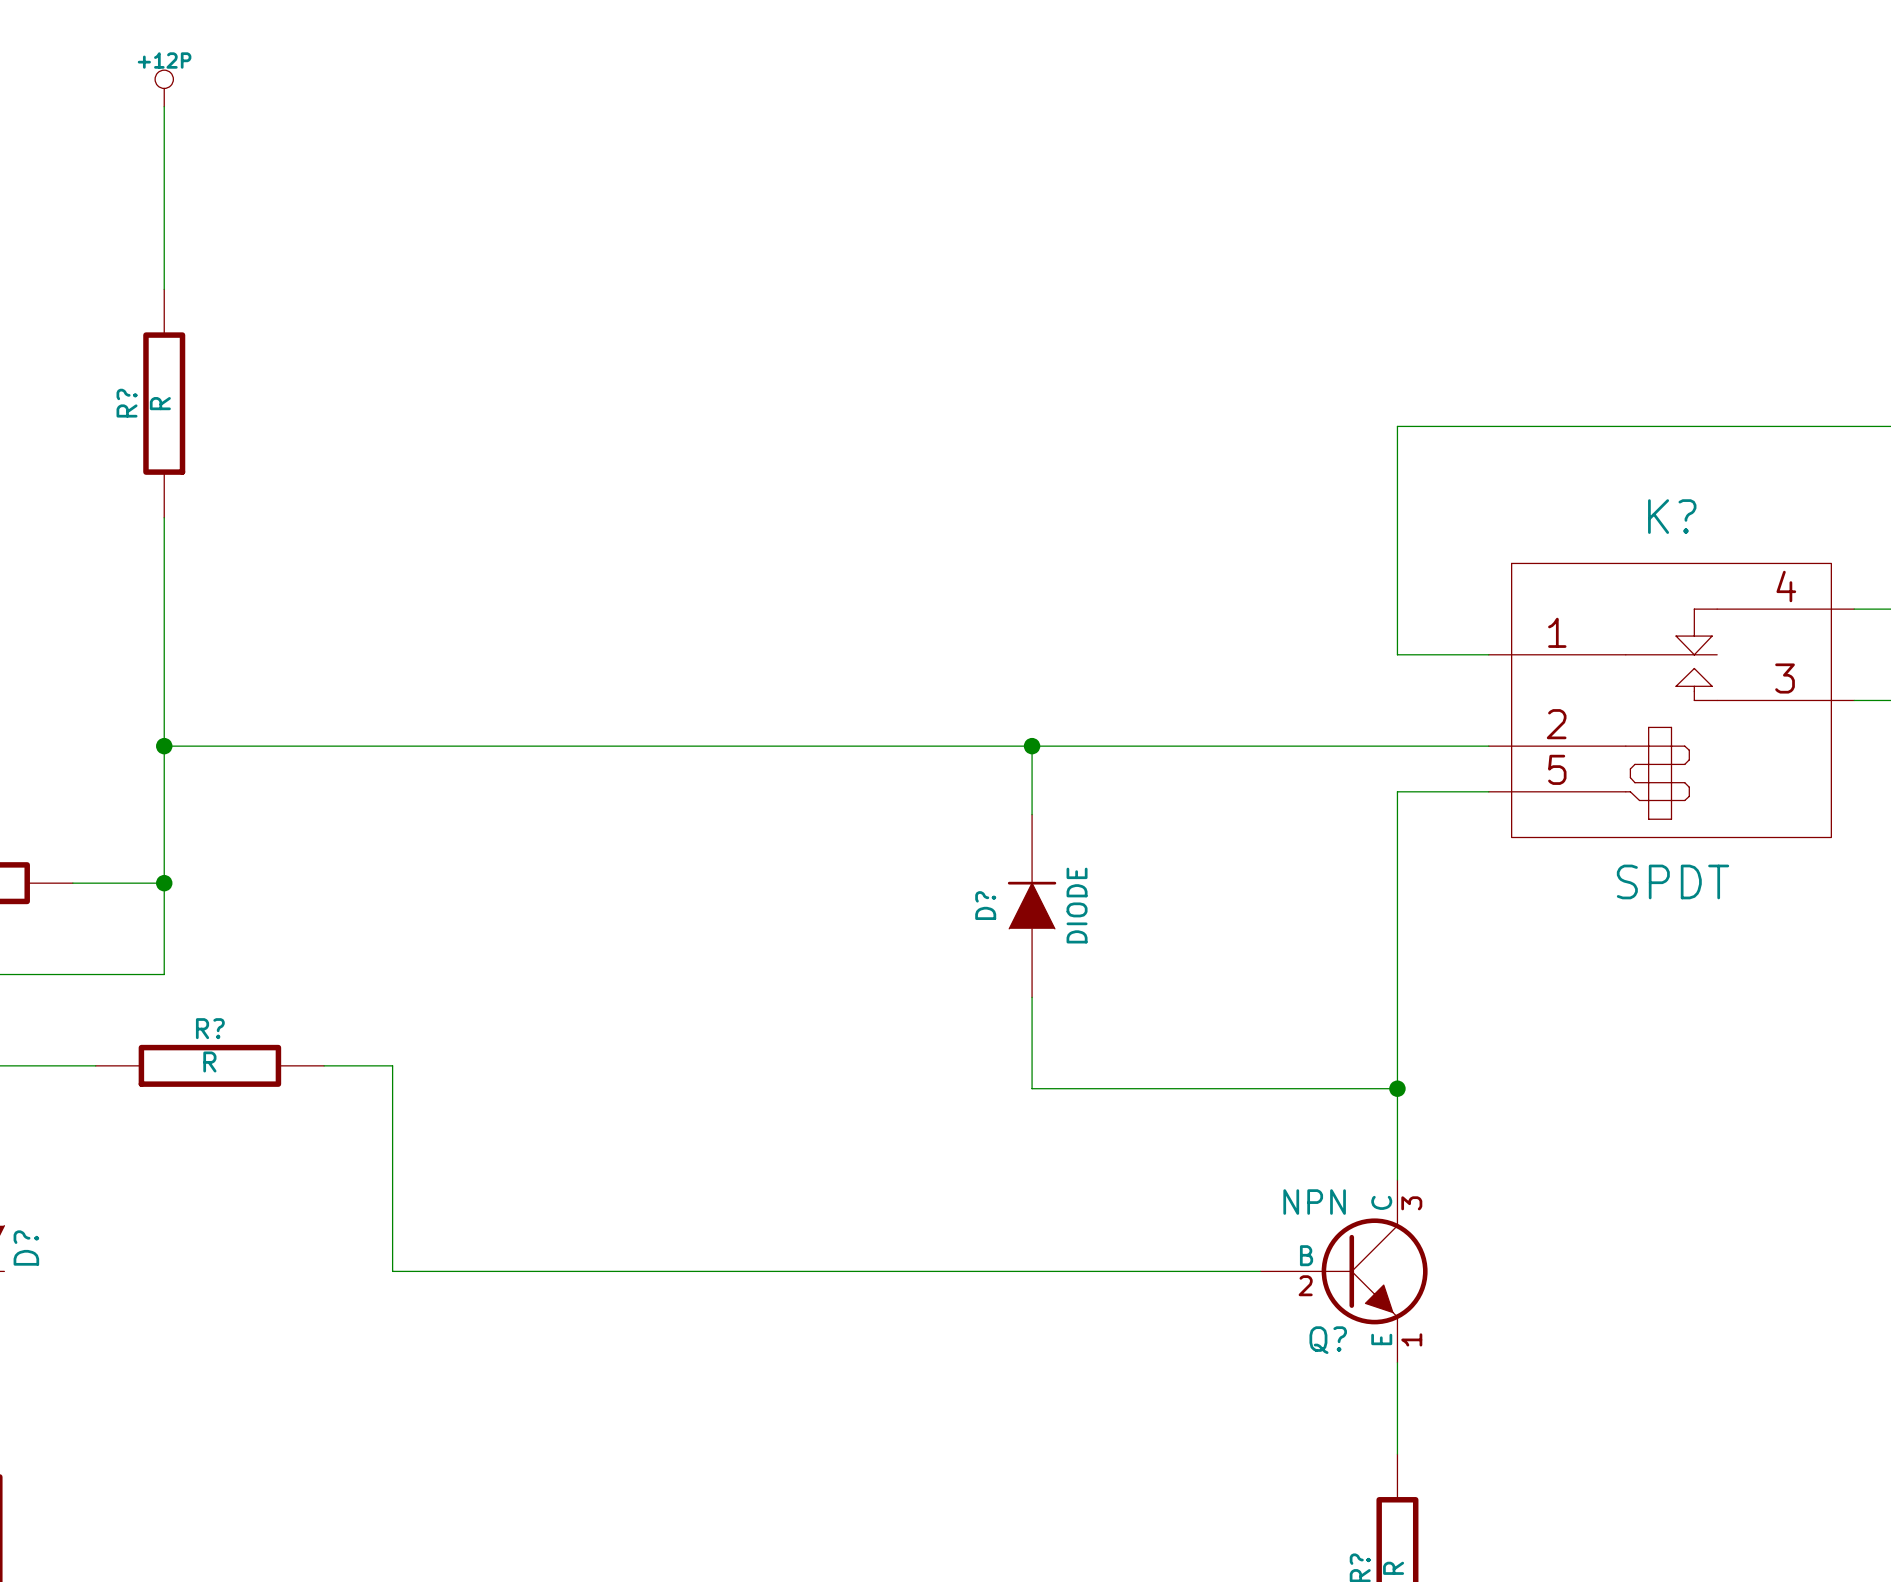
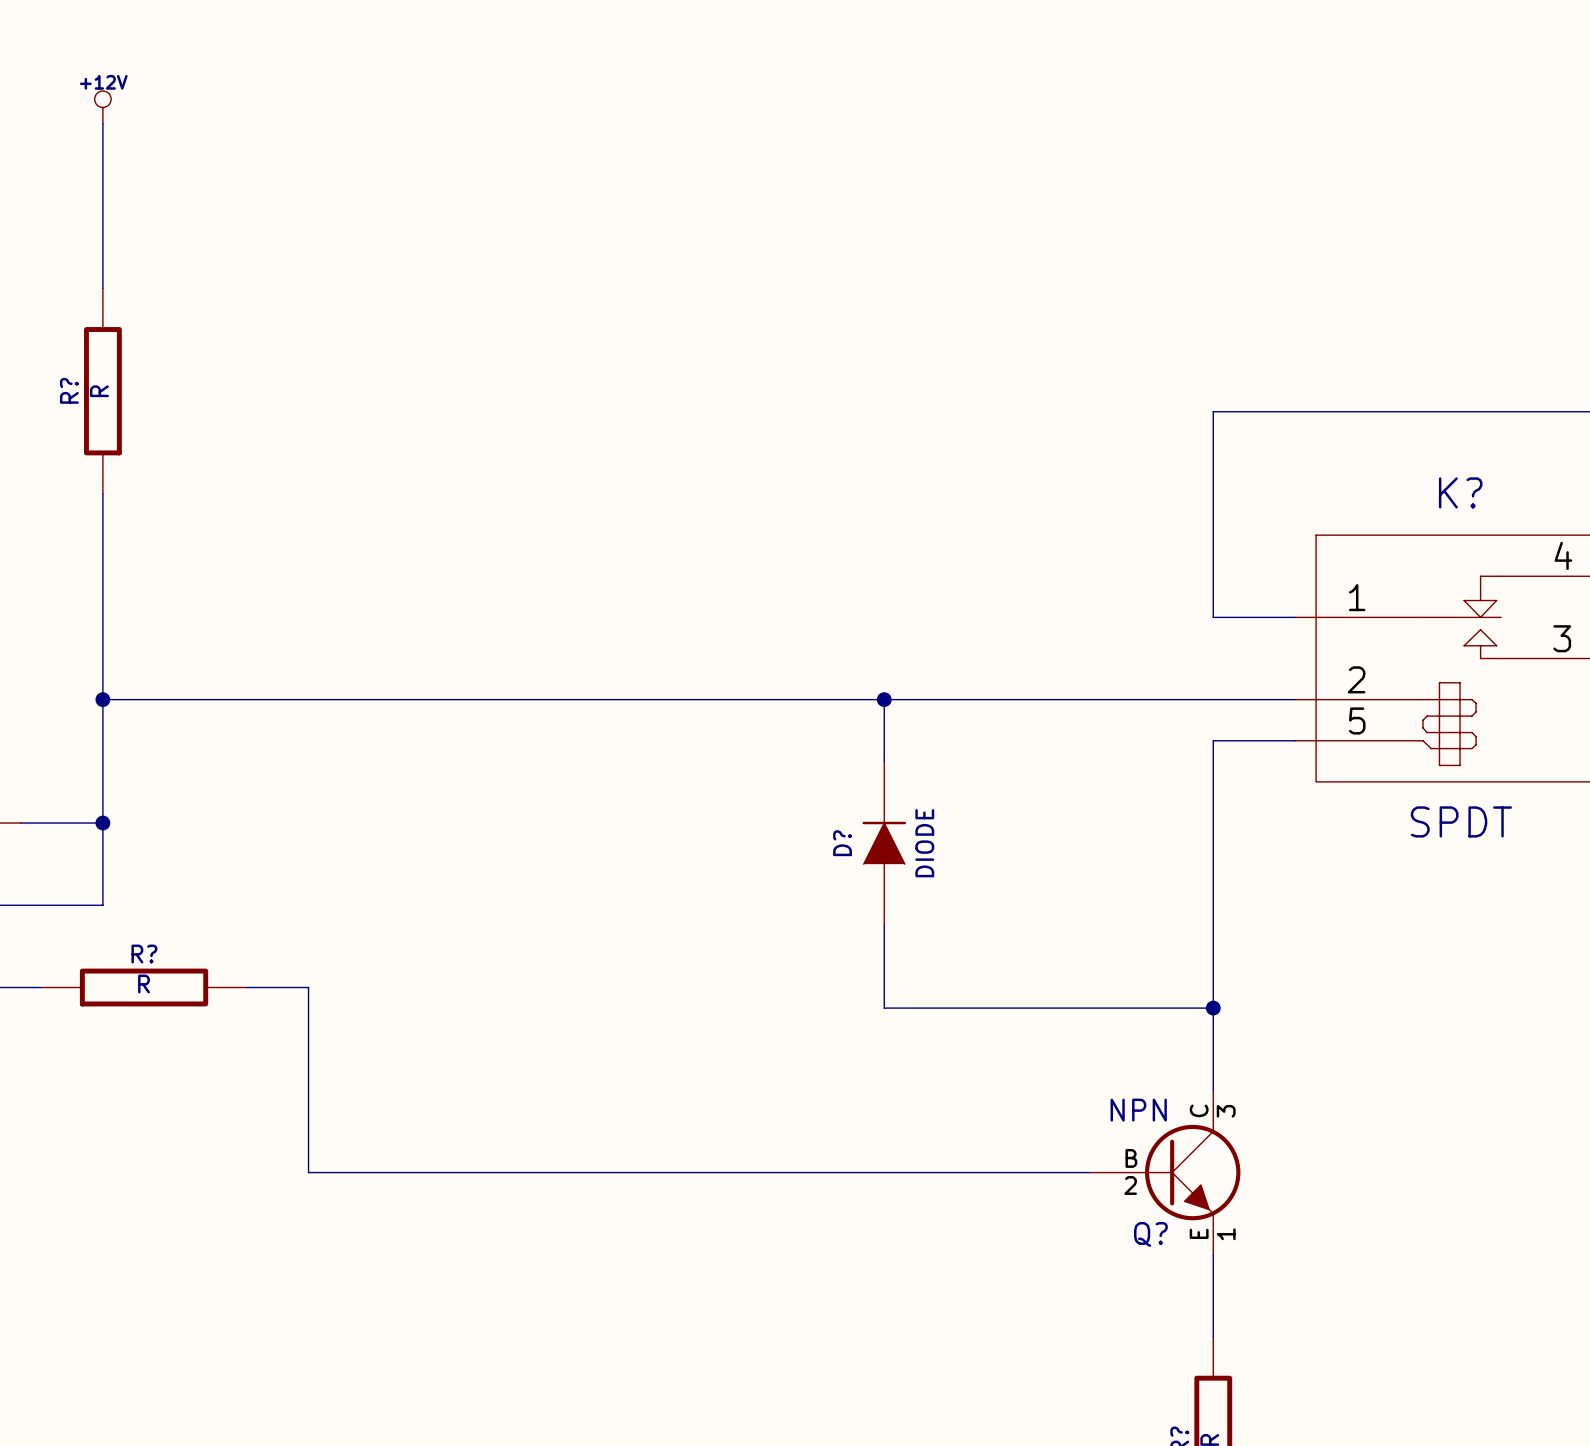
power symbol: +12P (164, 88) -> +12V (102, 107)

